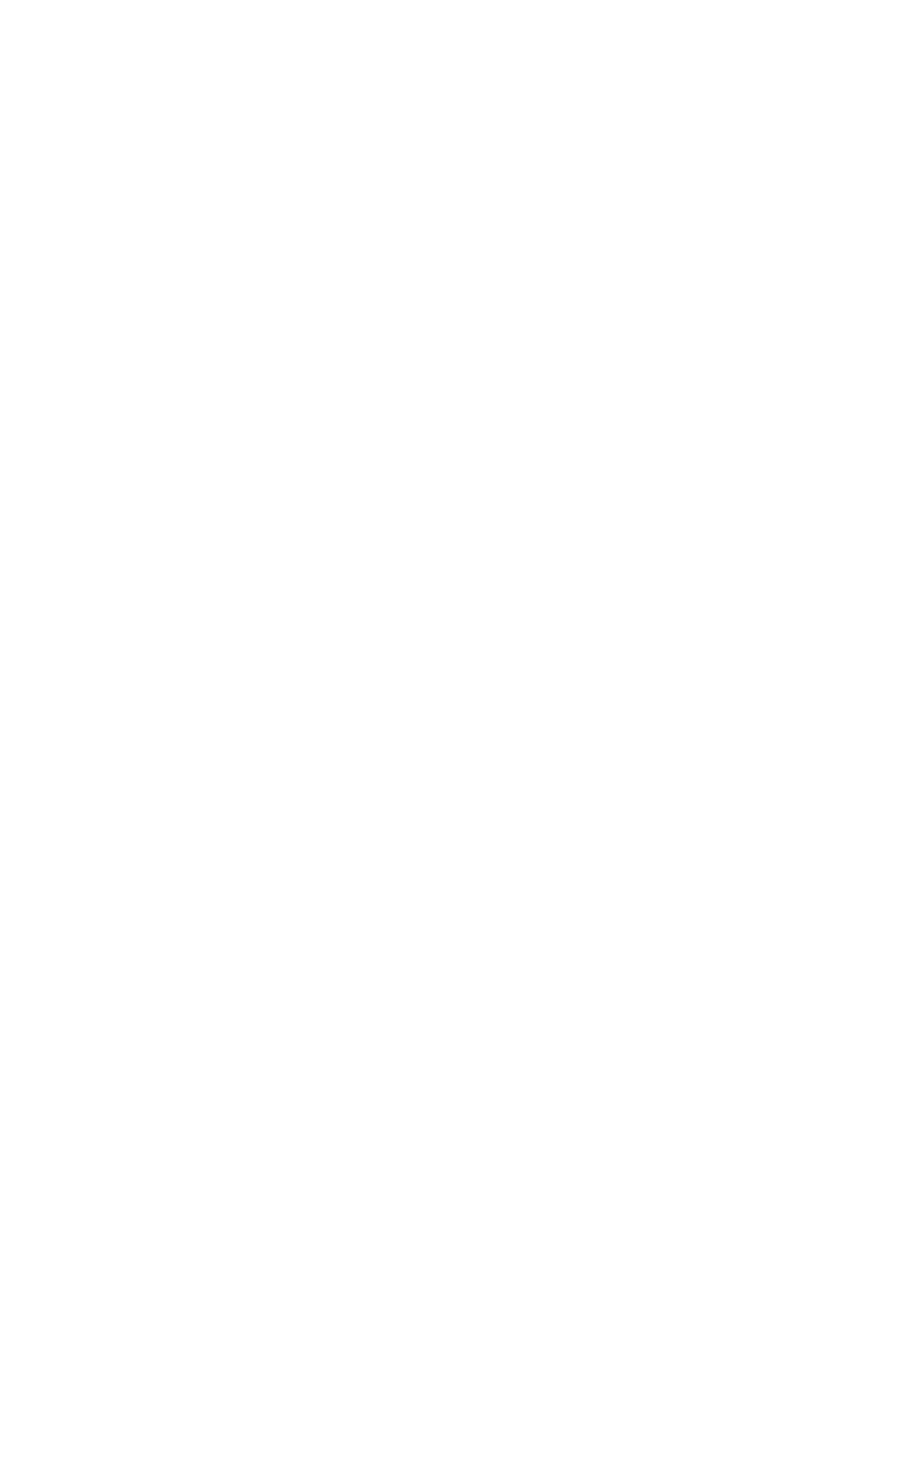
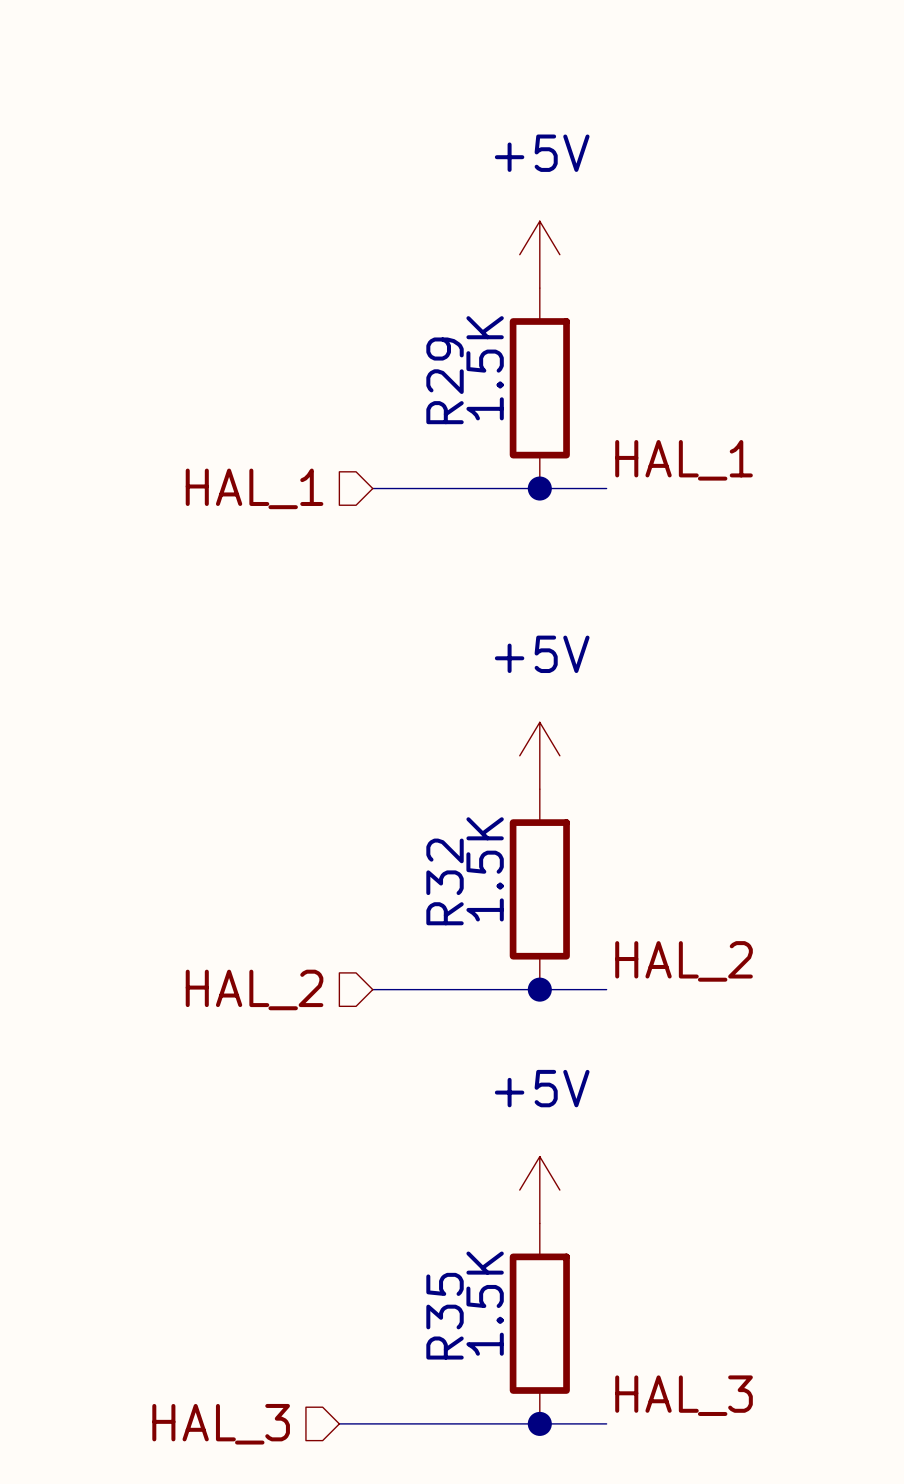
power symbol: none -> +5V (539, 254)
R29: none -> 1.5K (539, 388)
label: none -> HAL_1 (684, 460)
wire: none -> (372, 488) (606, 488)
junction: none -> (539, 488)
hierarchical label: none -> HAL_1 (254, 488)
power symbol: none -> +5V (539, 755)
R32: none -> 1.5K (539, 889)
label: none -> HAL_2 (684, 961)
wire: none -> (372, 989) (606, 989)
junction: none -> (539, 989)
hierarchical label: none -> HAL_2 (254, 989)
power symbol: none -> +5V (539, 1190)
R35: none -> 1.5K (539, 1323)
label: none -> HAL_3 (684, 1395)
wire: none -> (339, 1423) (606, 1423)
junction: none -> (539, 1423)
hierarchical label: none -> HAL_3 (221, 1424)

